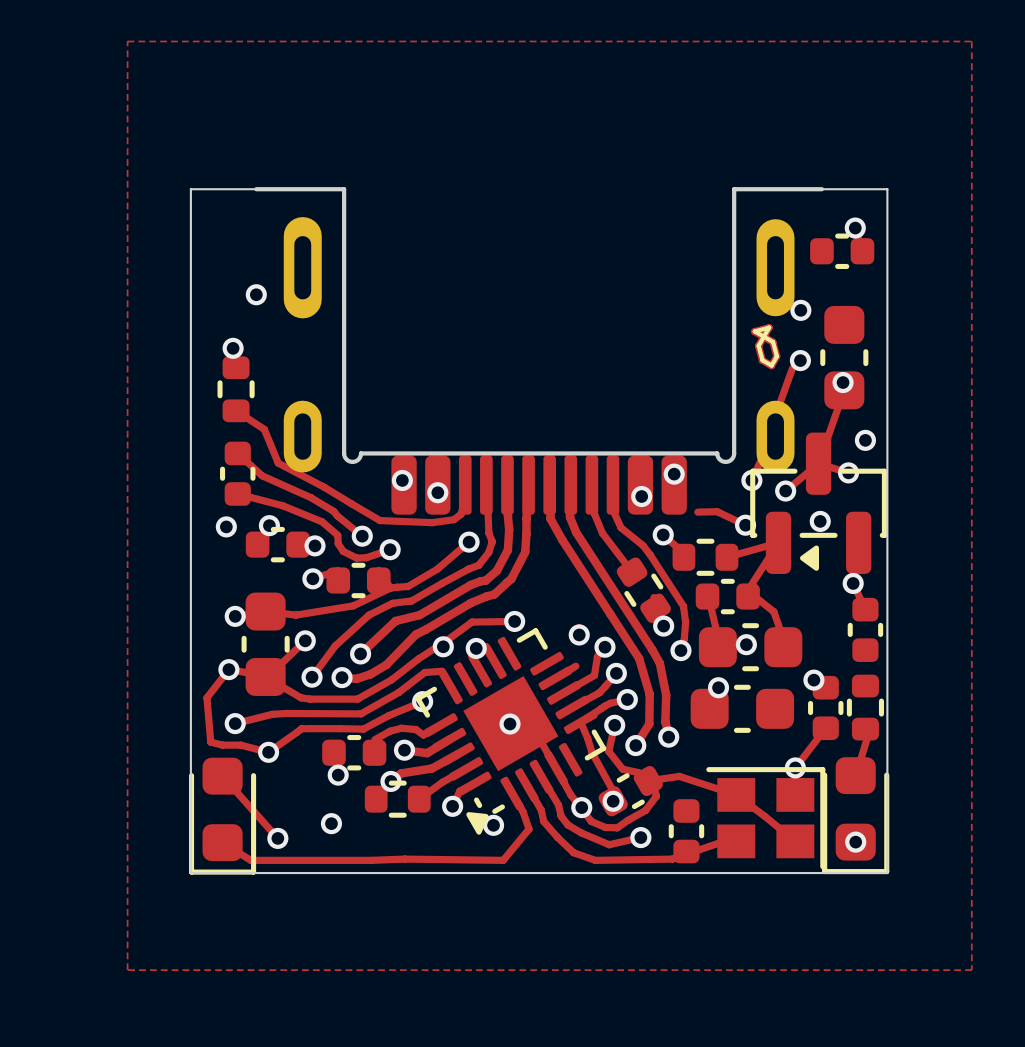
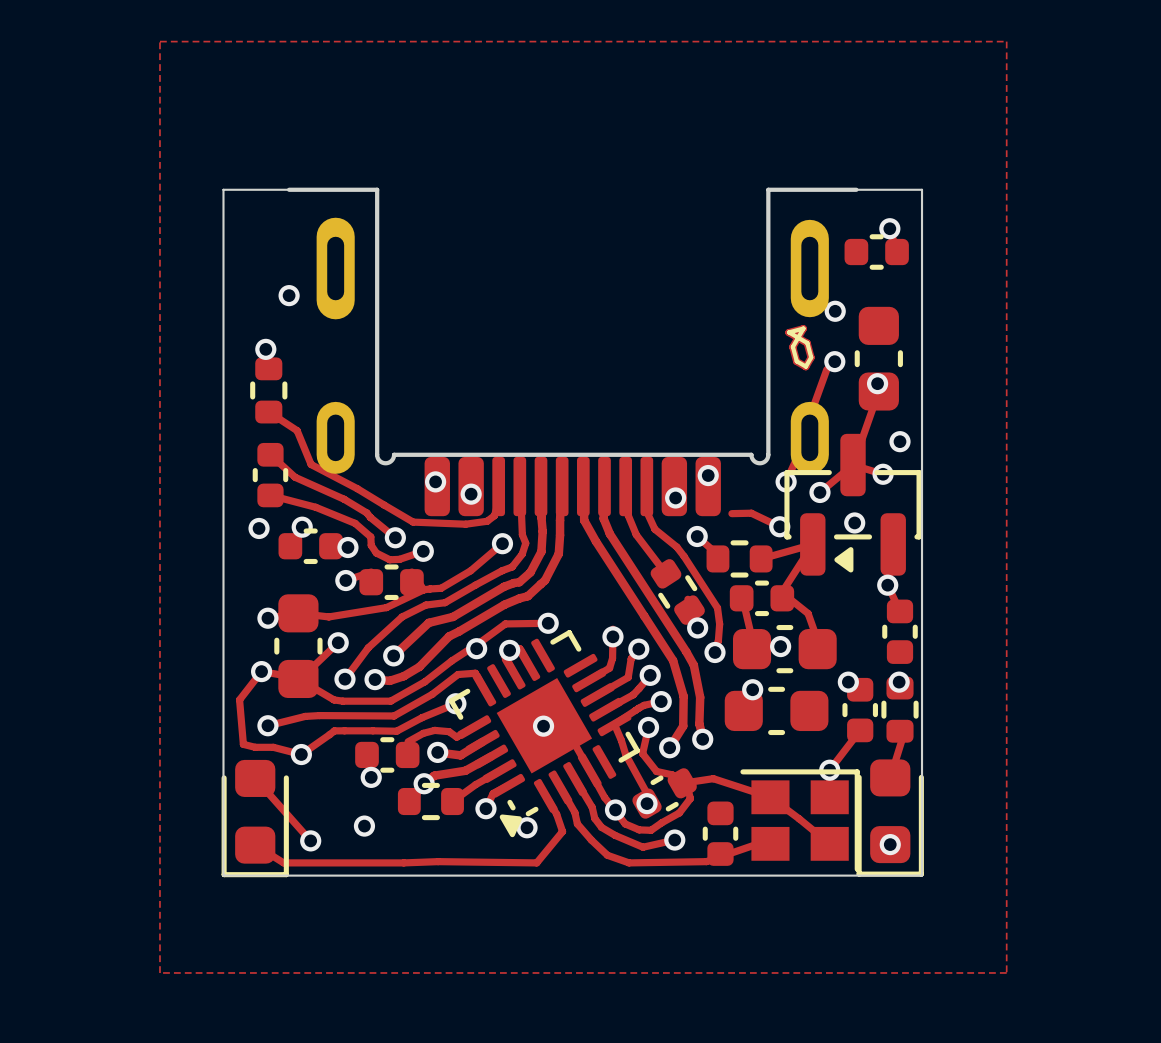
track: none -> (612, 636) (612, 658) (609, 668)
via: none -> (899, 682)

